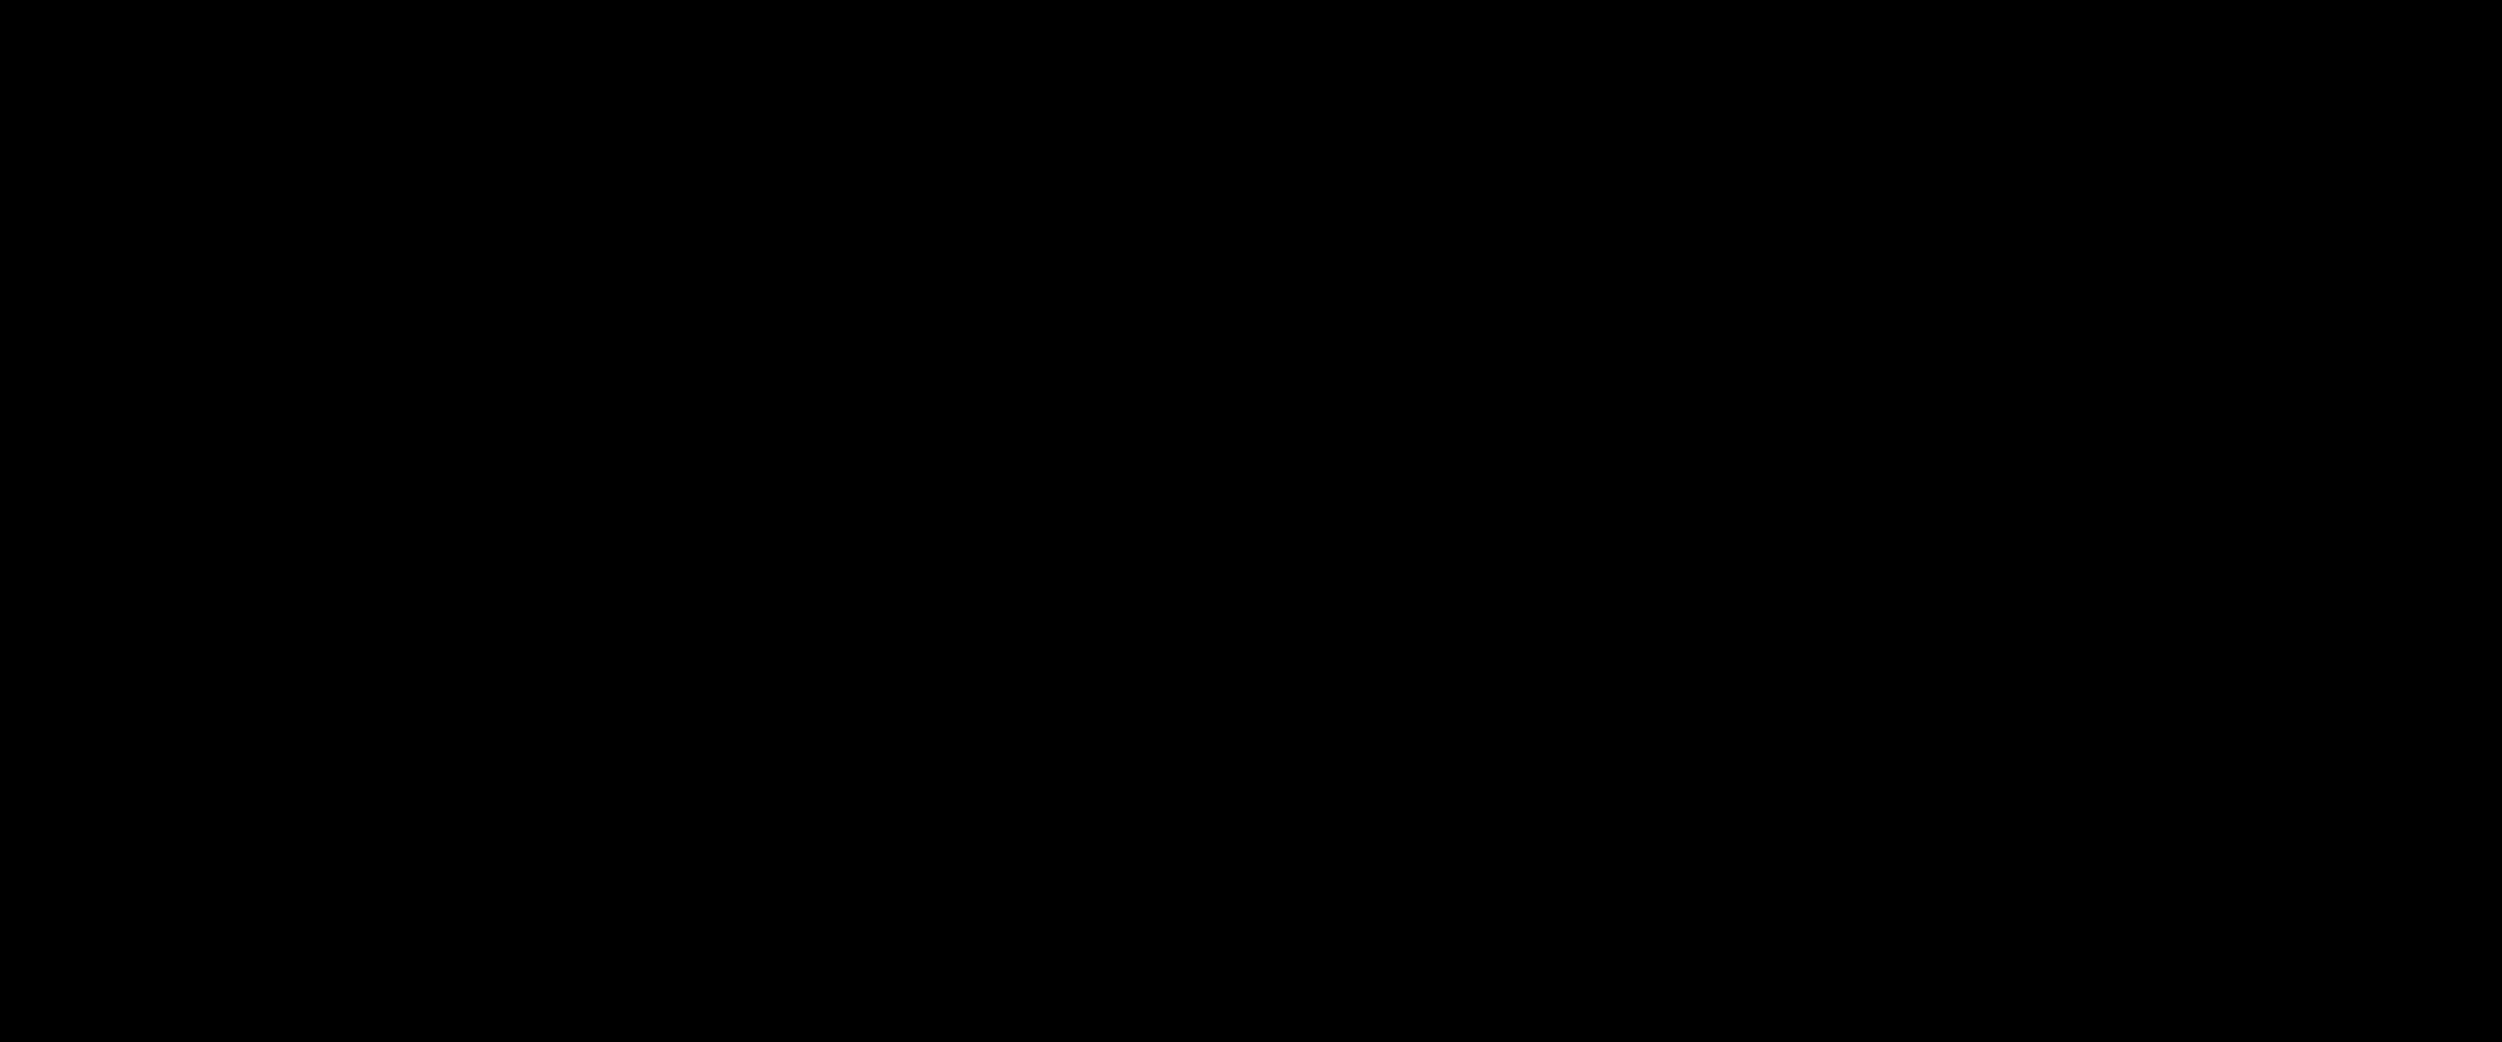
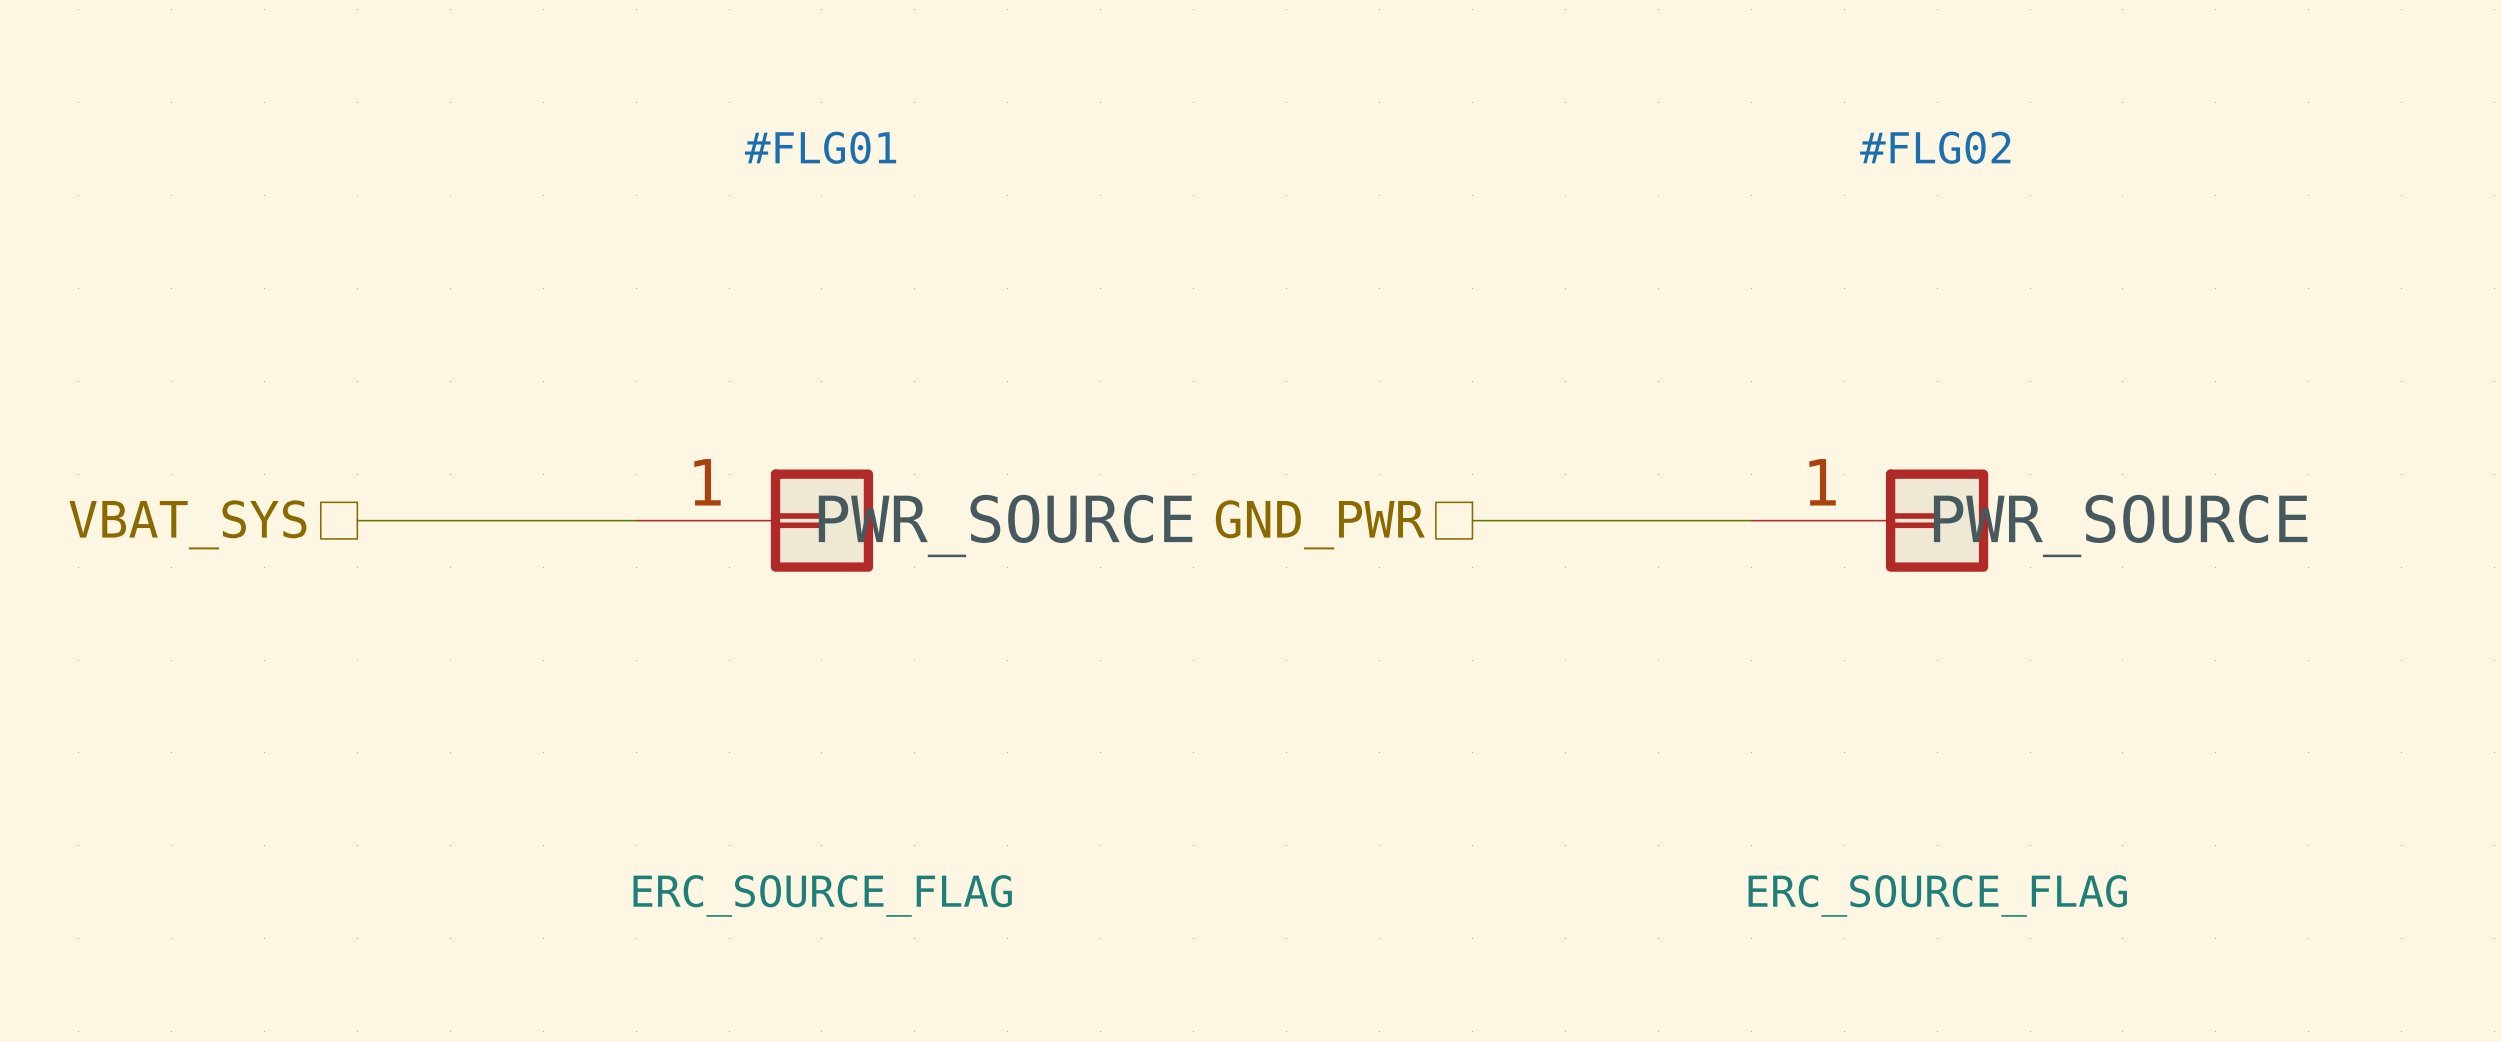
wire: none -> (357, 520) (636, 520)
#FLG01: none -> ERC_SOURCE_FLAG (754, 520)
wire: none -> (1472, 520) (1751, 520)
#FLG02: none -> ERC_SOURCE_FLAG (1869, 520)
hierarchical label: none -> VBAT_SYS (187, 524)
hierarchical label: none -> GND_PWR (1320, 524)

